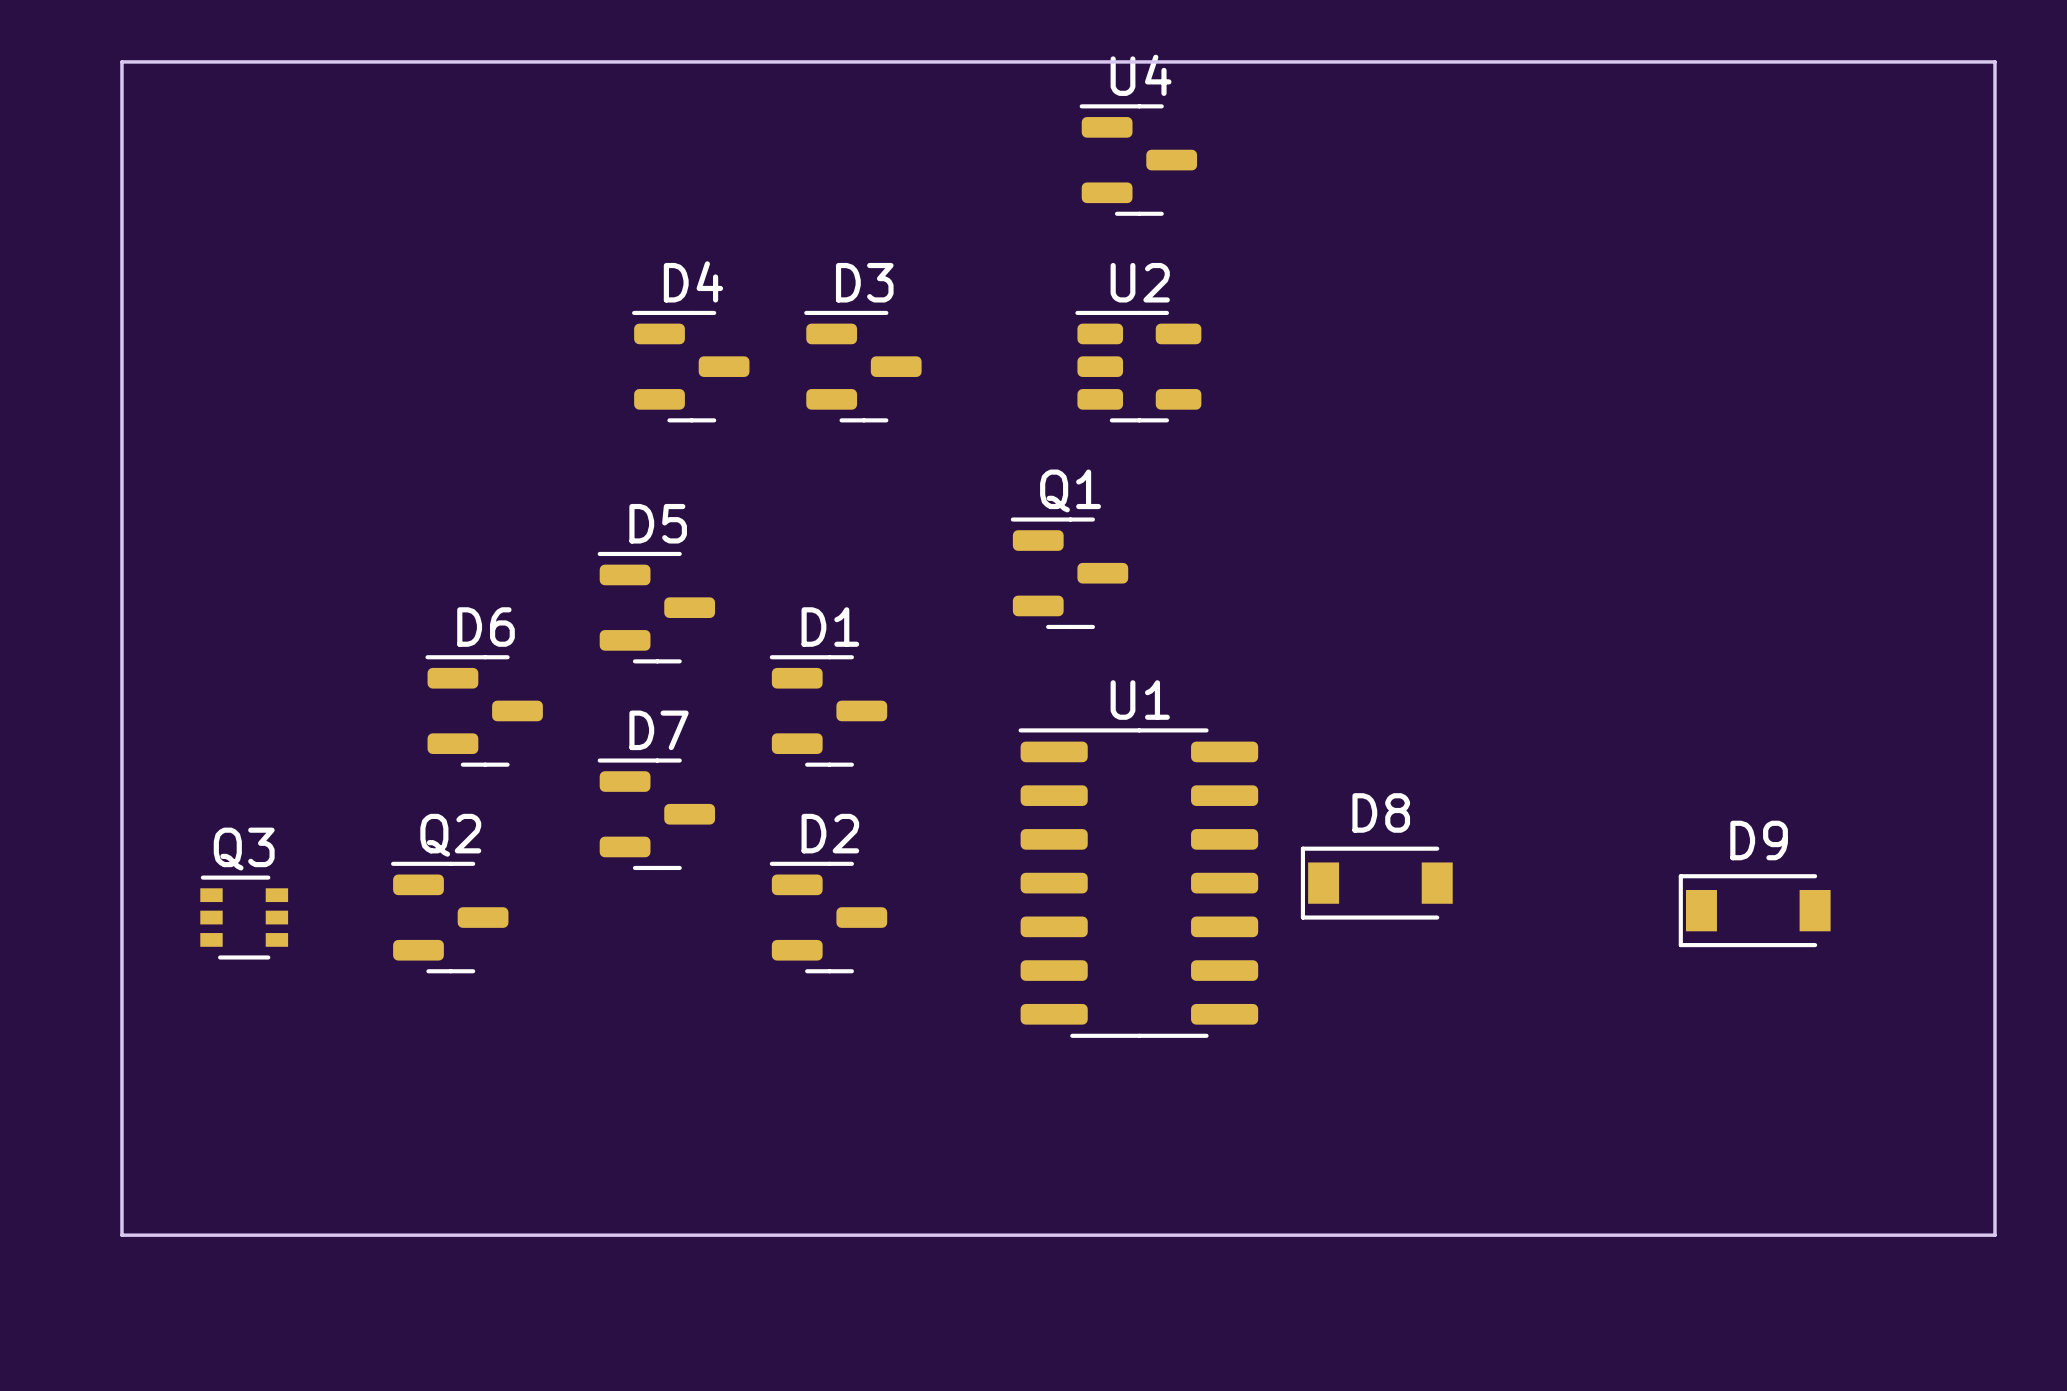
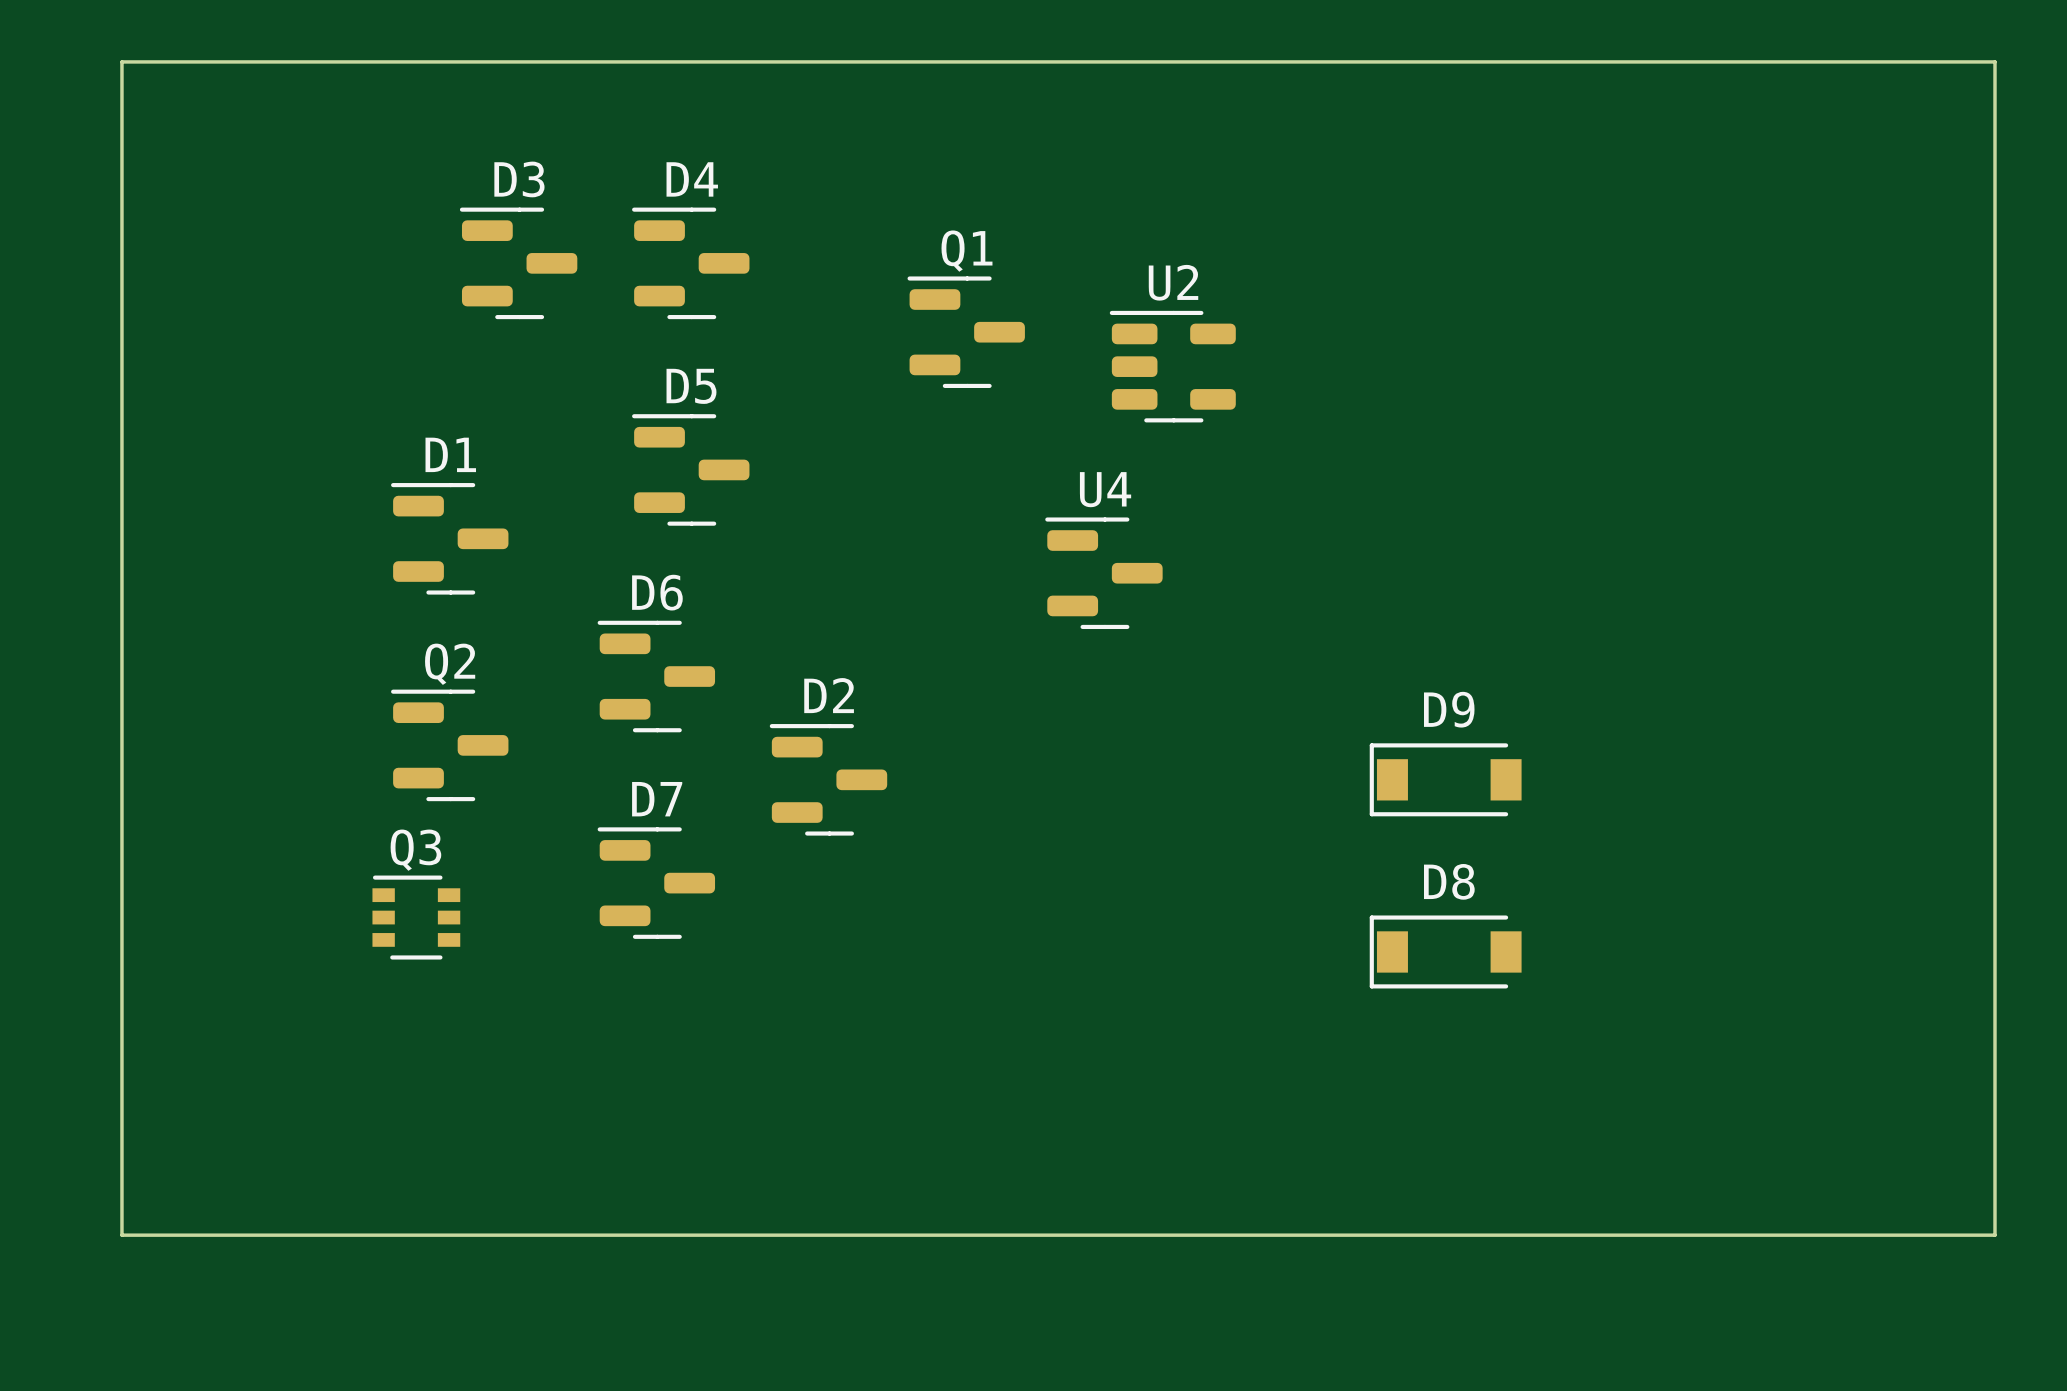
U4 position: (1138, 160) -> (1103, 573)
D4 position: (690, 366) -> (690, 263)
D3 position: (862, 366) -> (518, 263)
U2 position: (1138, 366) -> (1172, 366)
Q1 position: (1069, 573) -> (966, 332)
D5 position: (656, 607) -> (690, 469)
D6 position: (484, 710) -> (656, 676)
D1 position: (828, 710) -> (449, 538)
D7 position: (656, 814) -> (656, 883)
U1: (1138, 883) -> none
D8 position: (1376, 883) -> (1445, 951)
D9 position: (1754, 910) -> (1445, 779)
Q3 position: (244, 917) -> (416, 917)
Q2 position: (449, 917) -> (449, 745)
D2 position: (828, 917) -> (828, 779)

